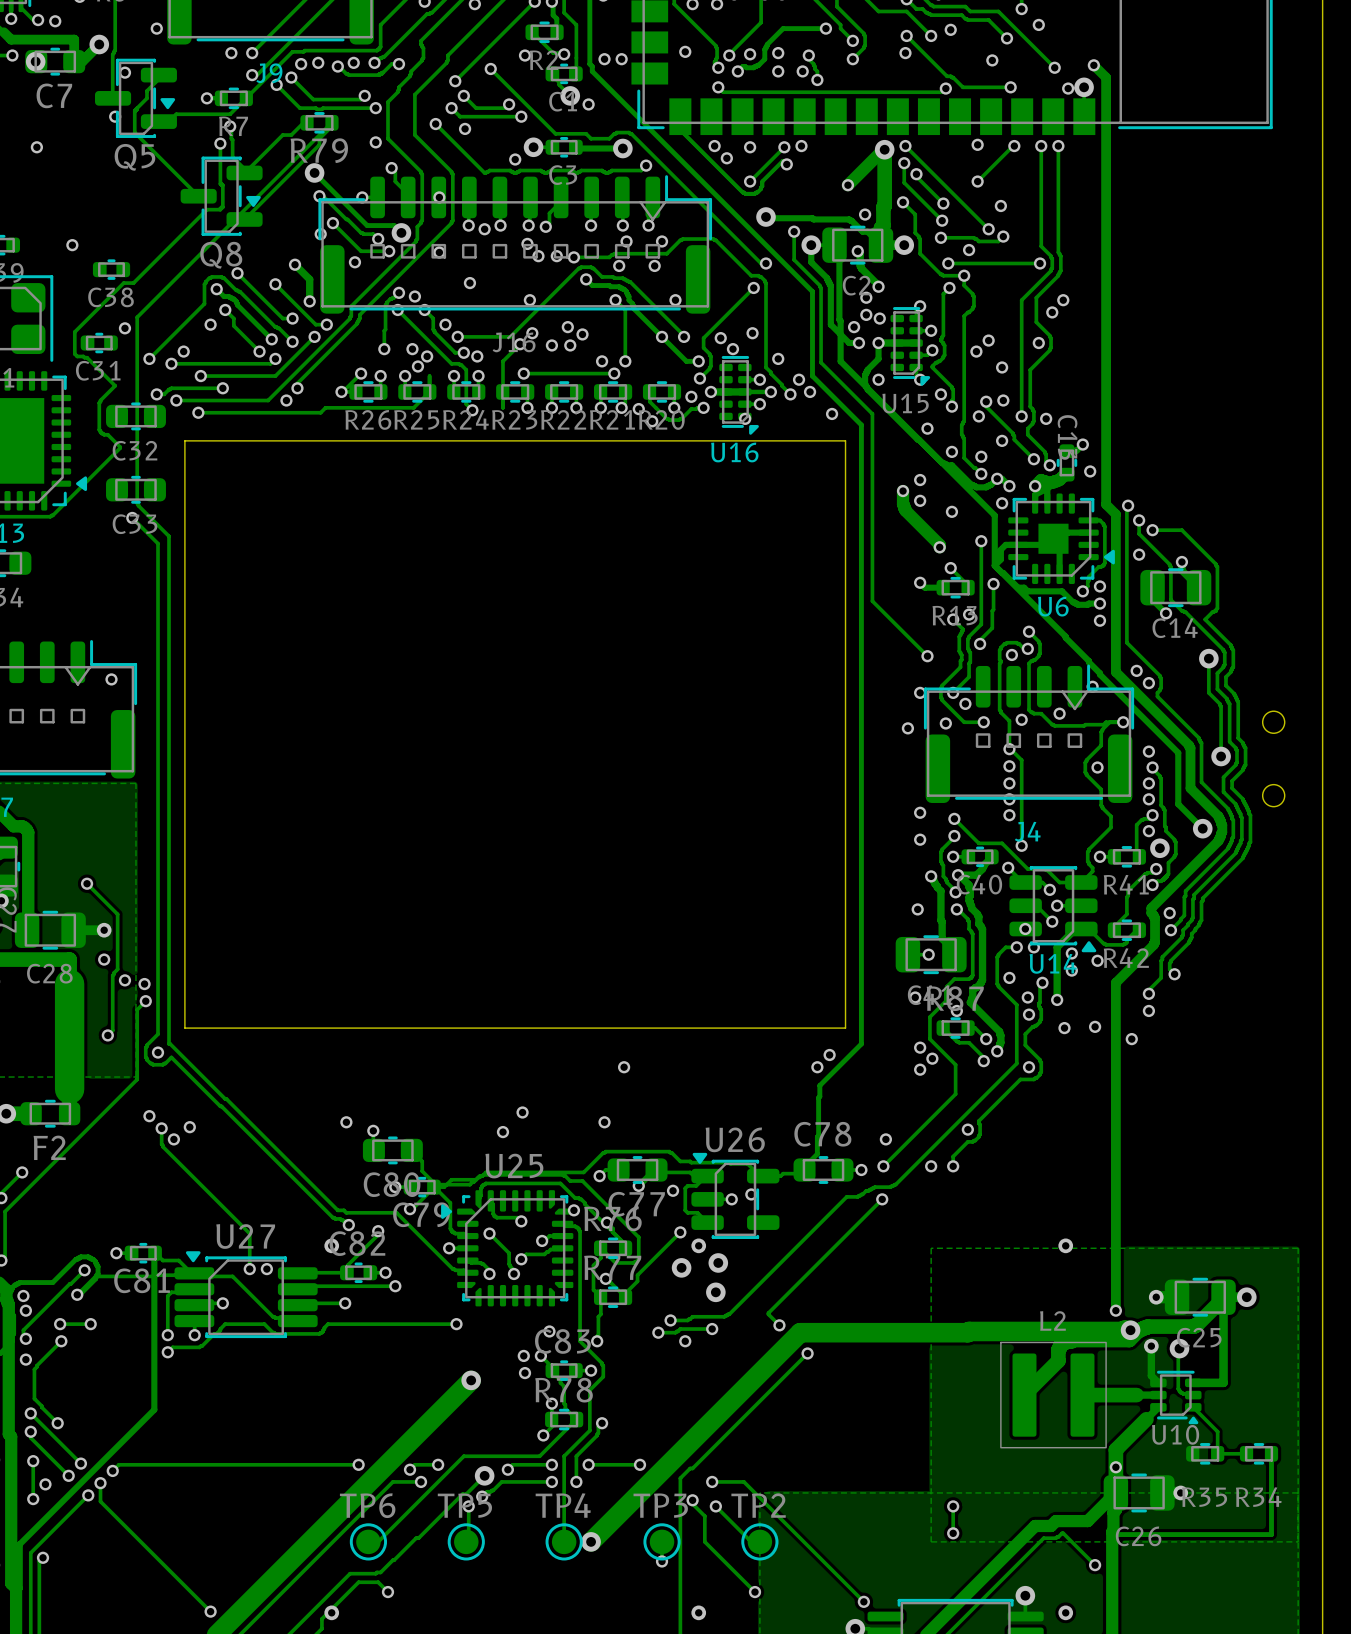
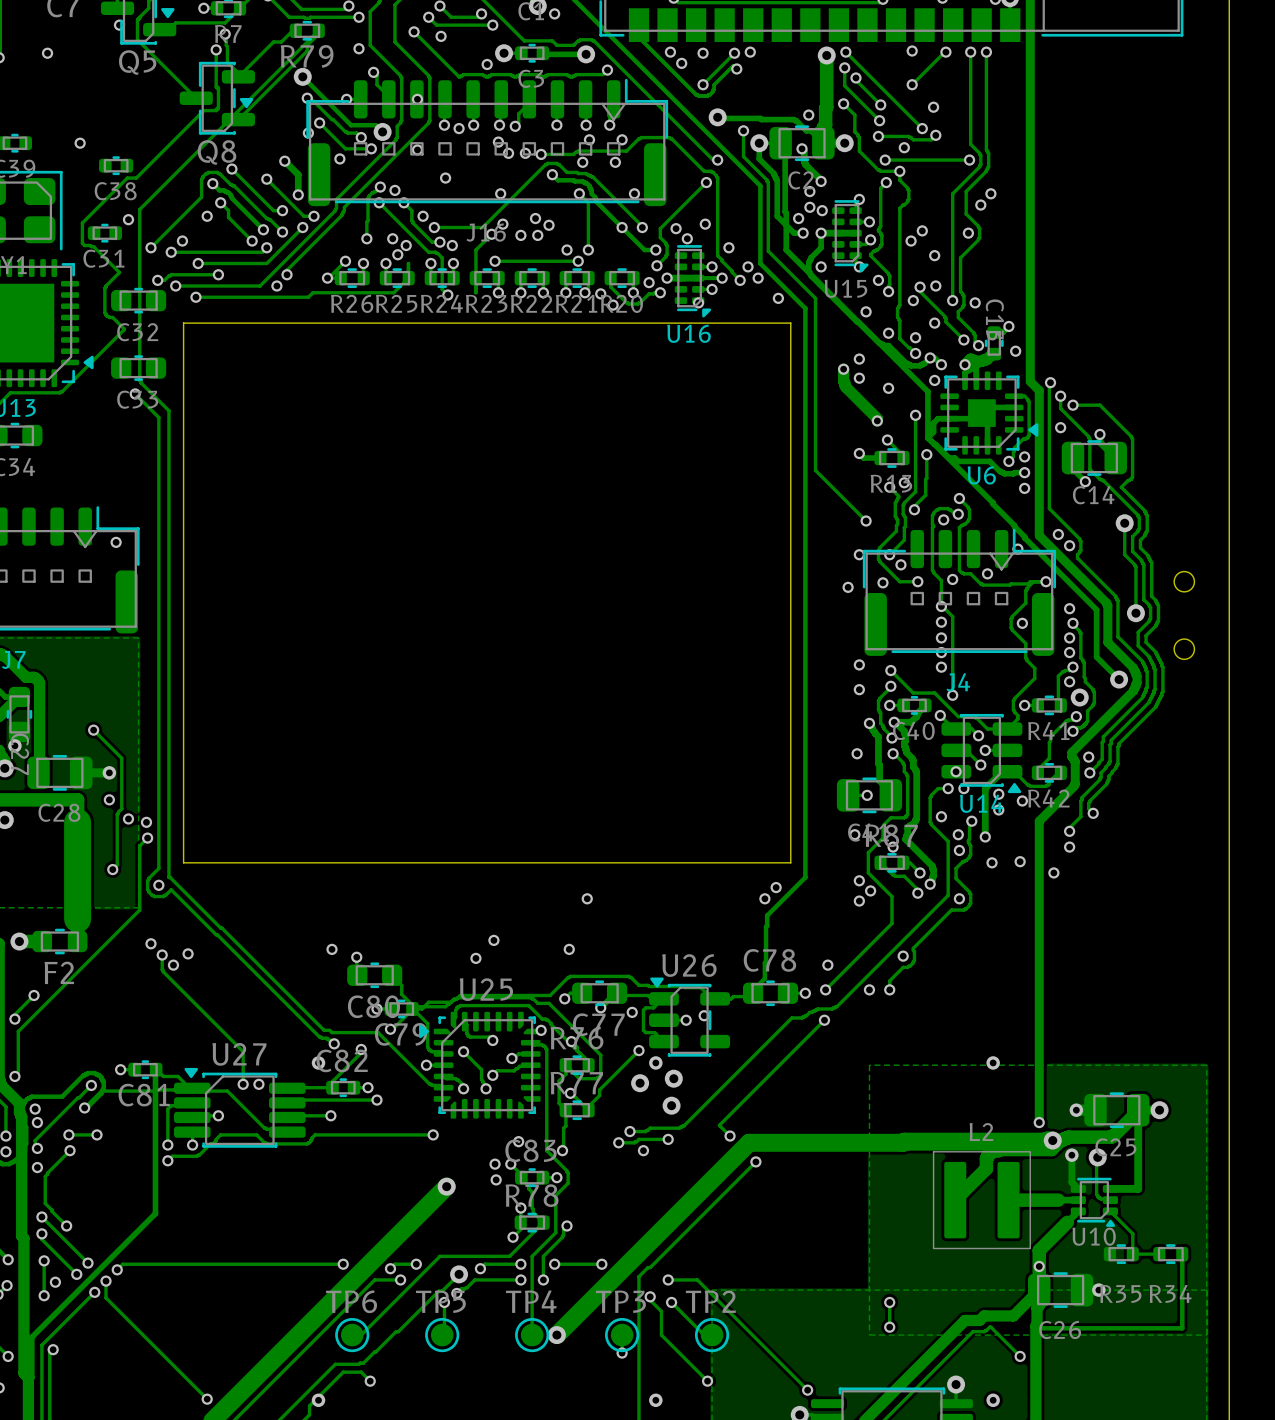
track: (884, 149) (847, 185) -> none
via: (847, 185) -> none

